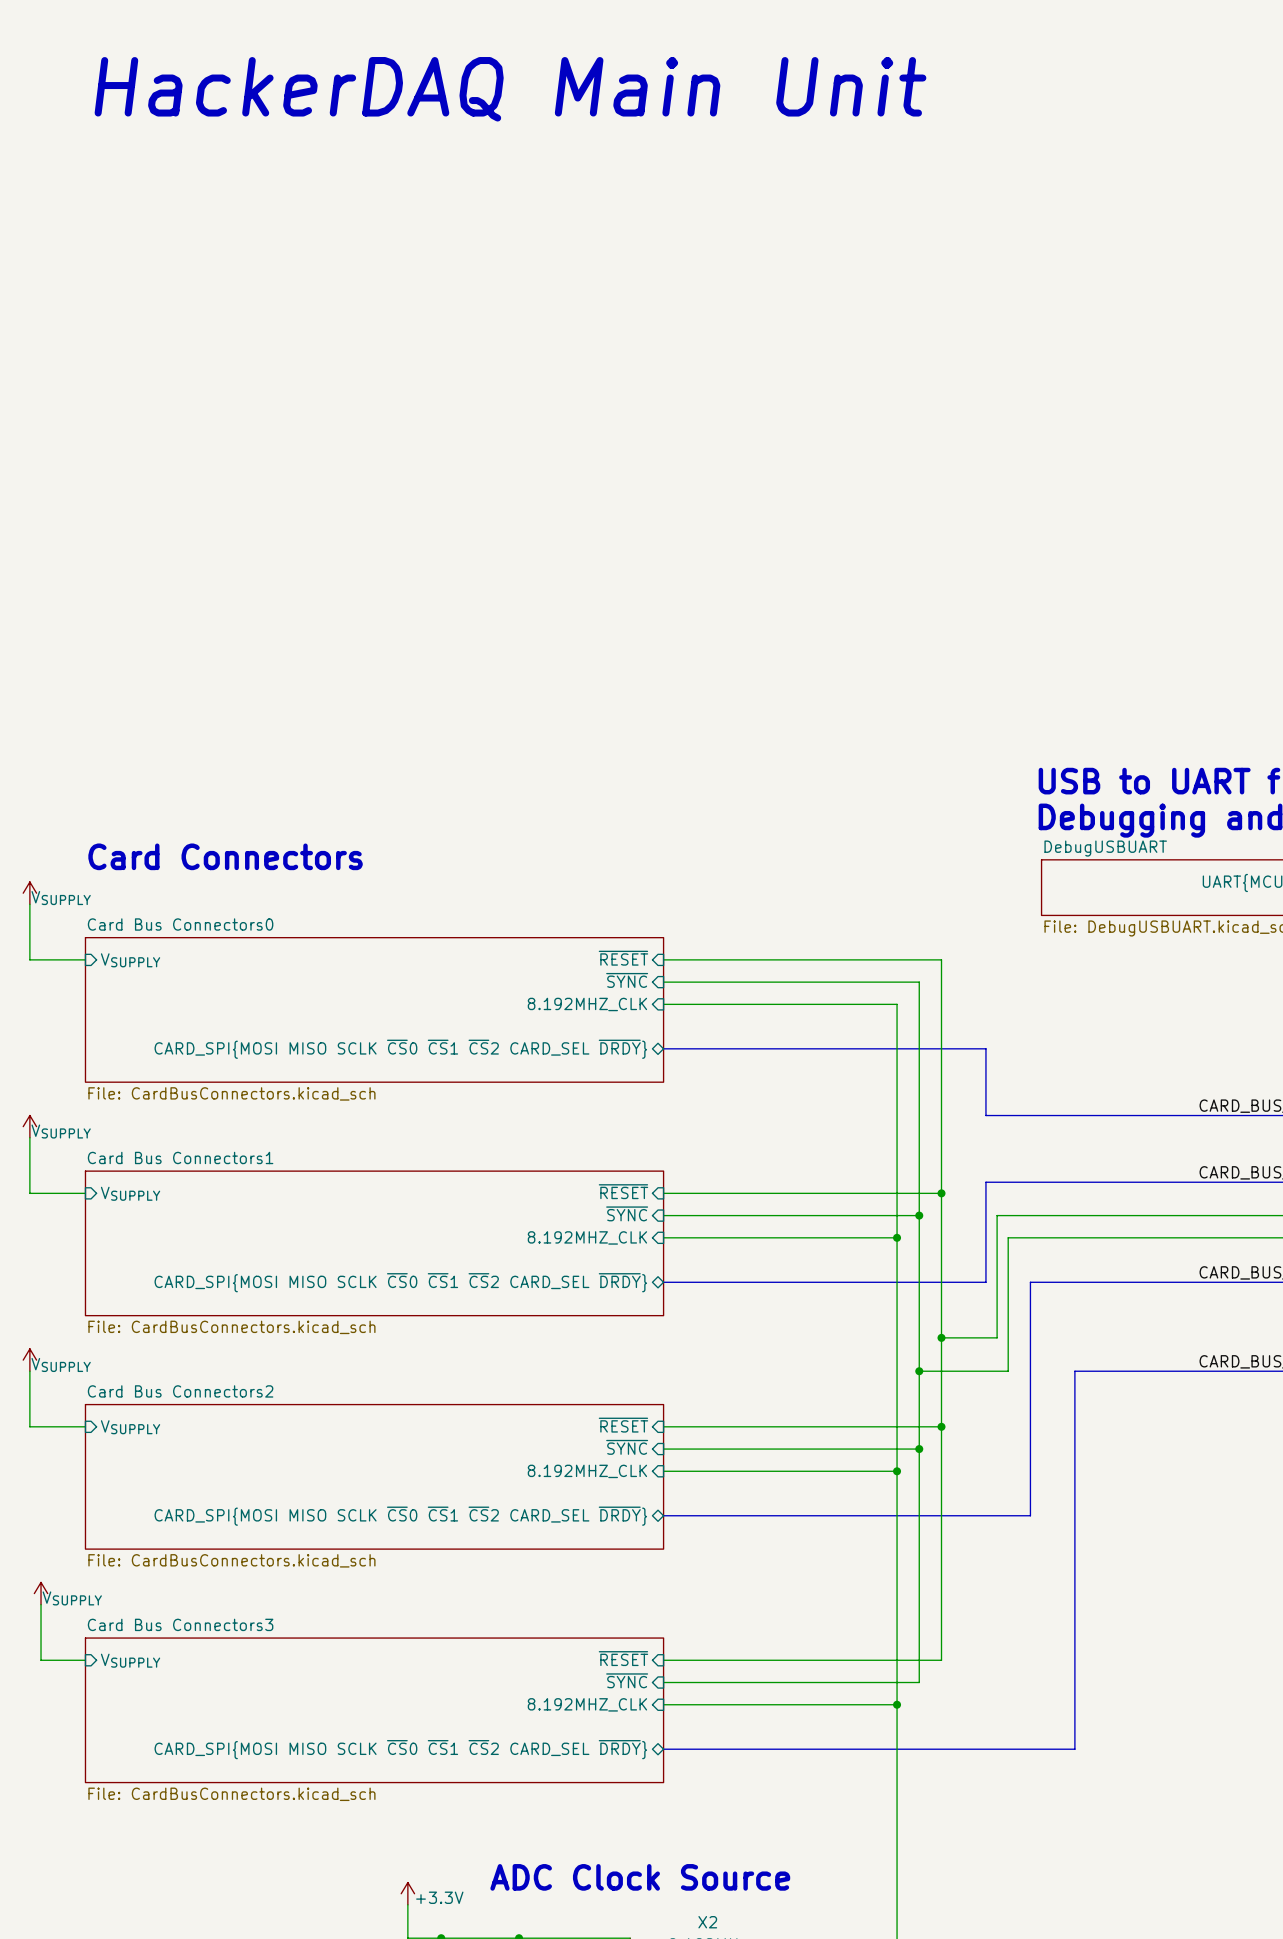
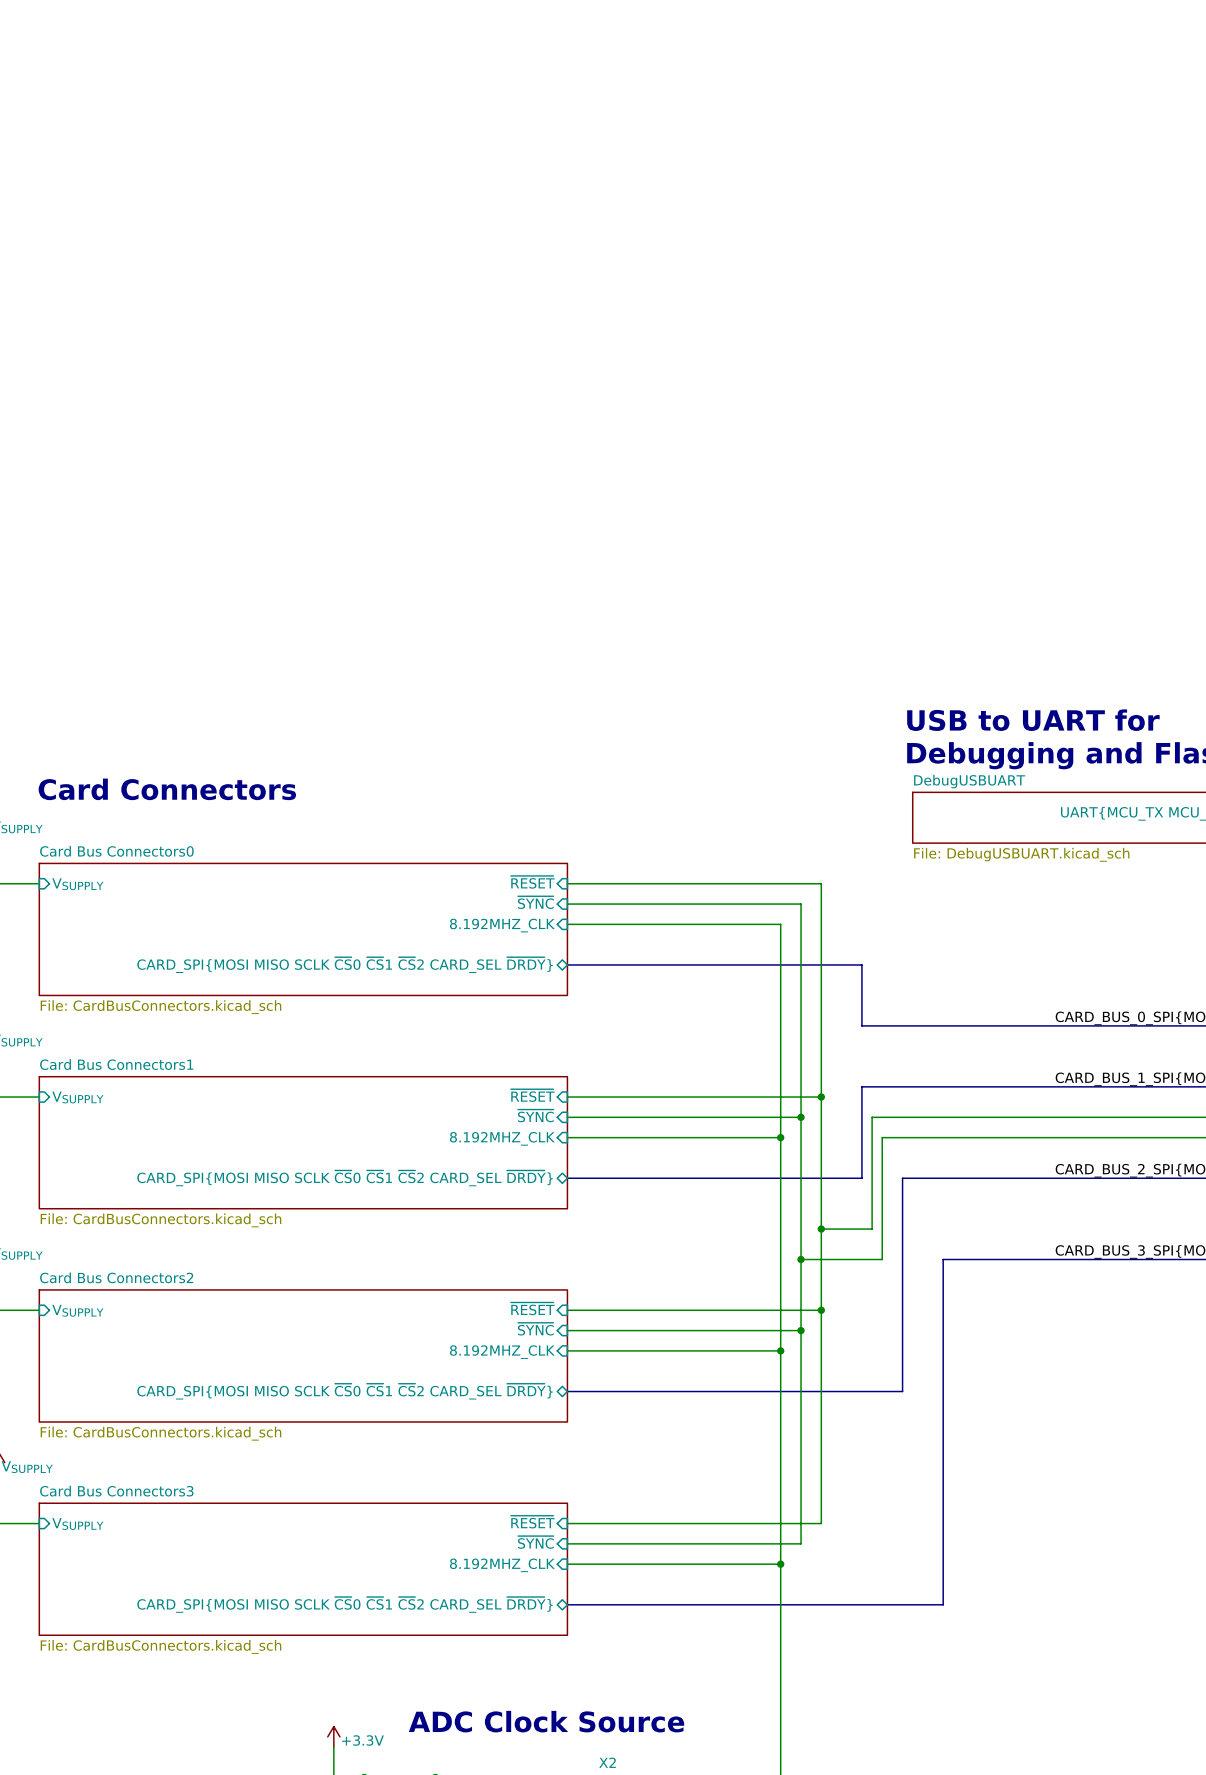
text: HackerDAQ Main Unit (510, 89) -> none

